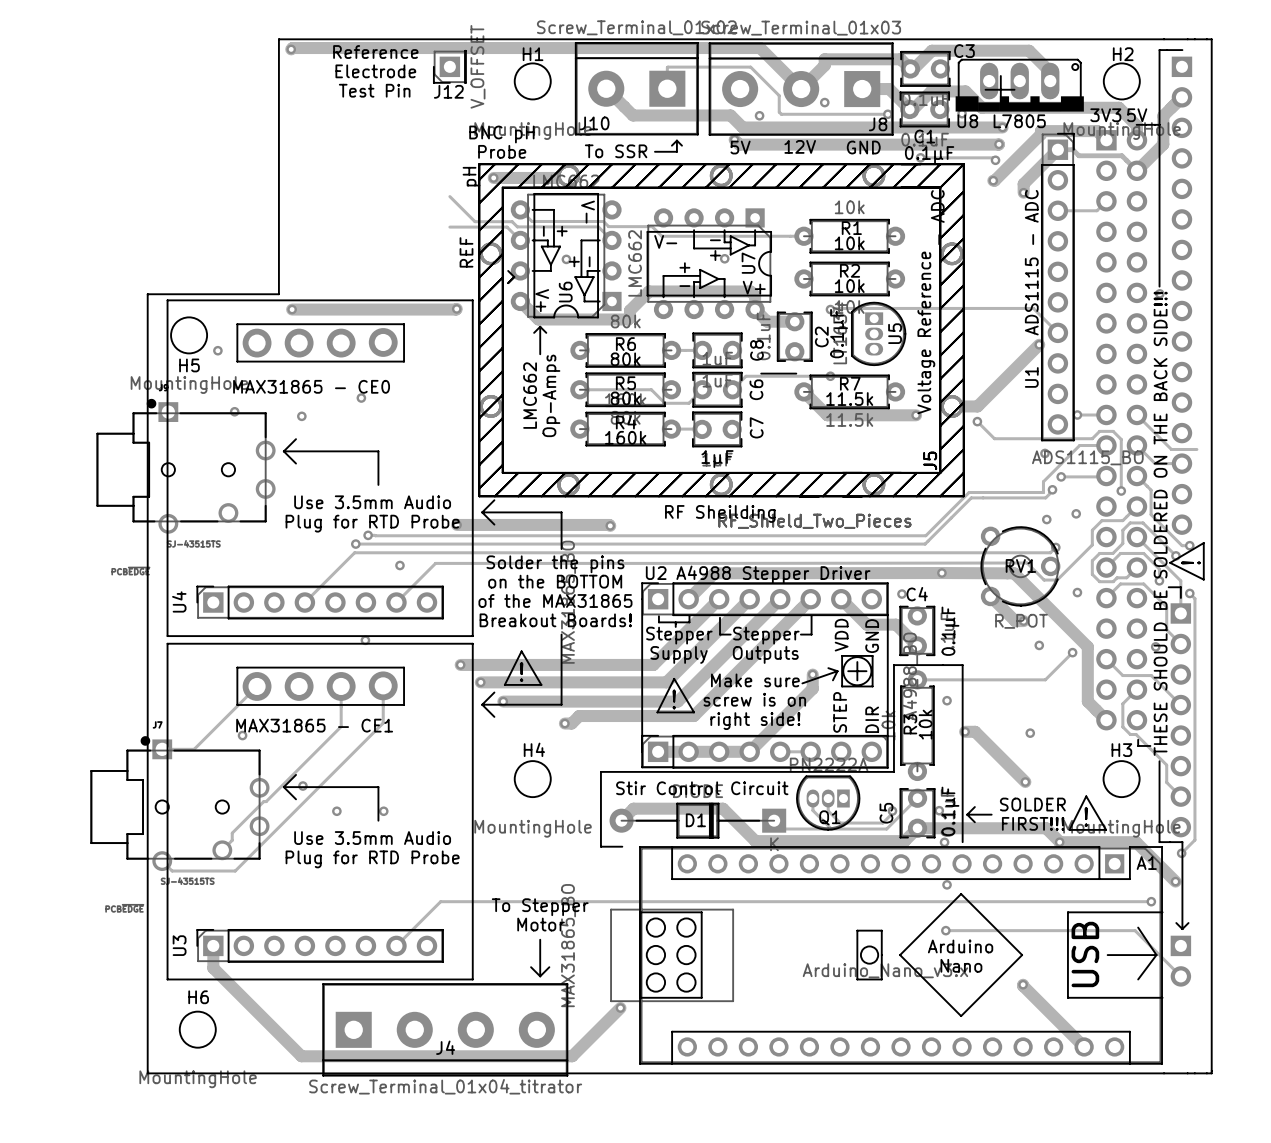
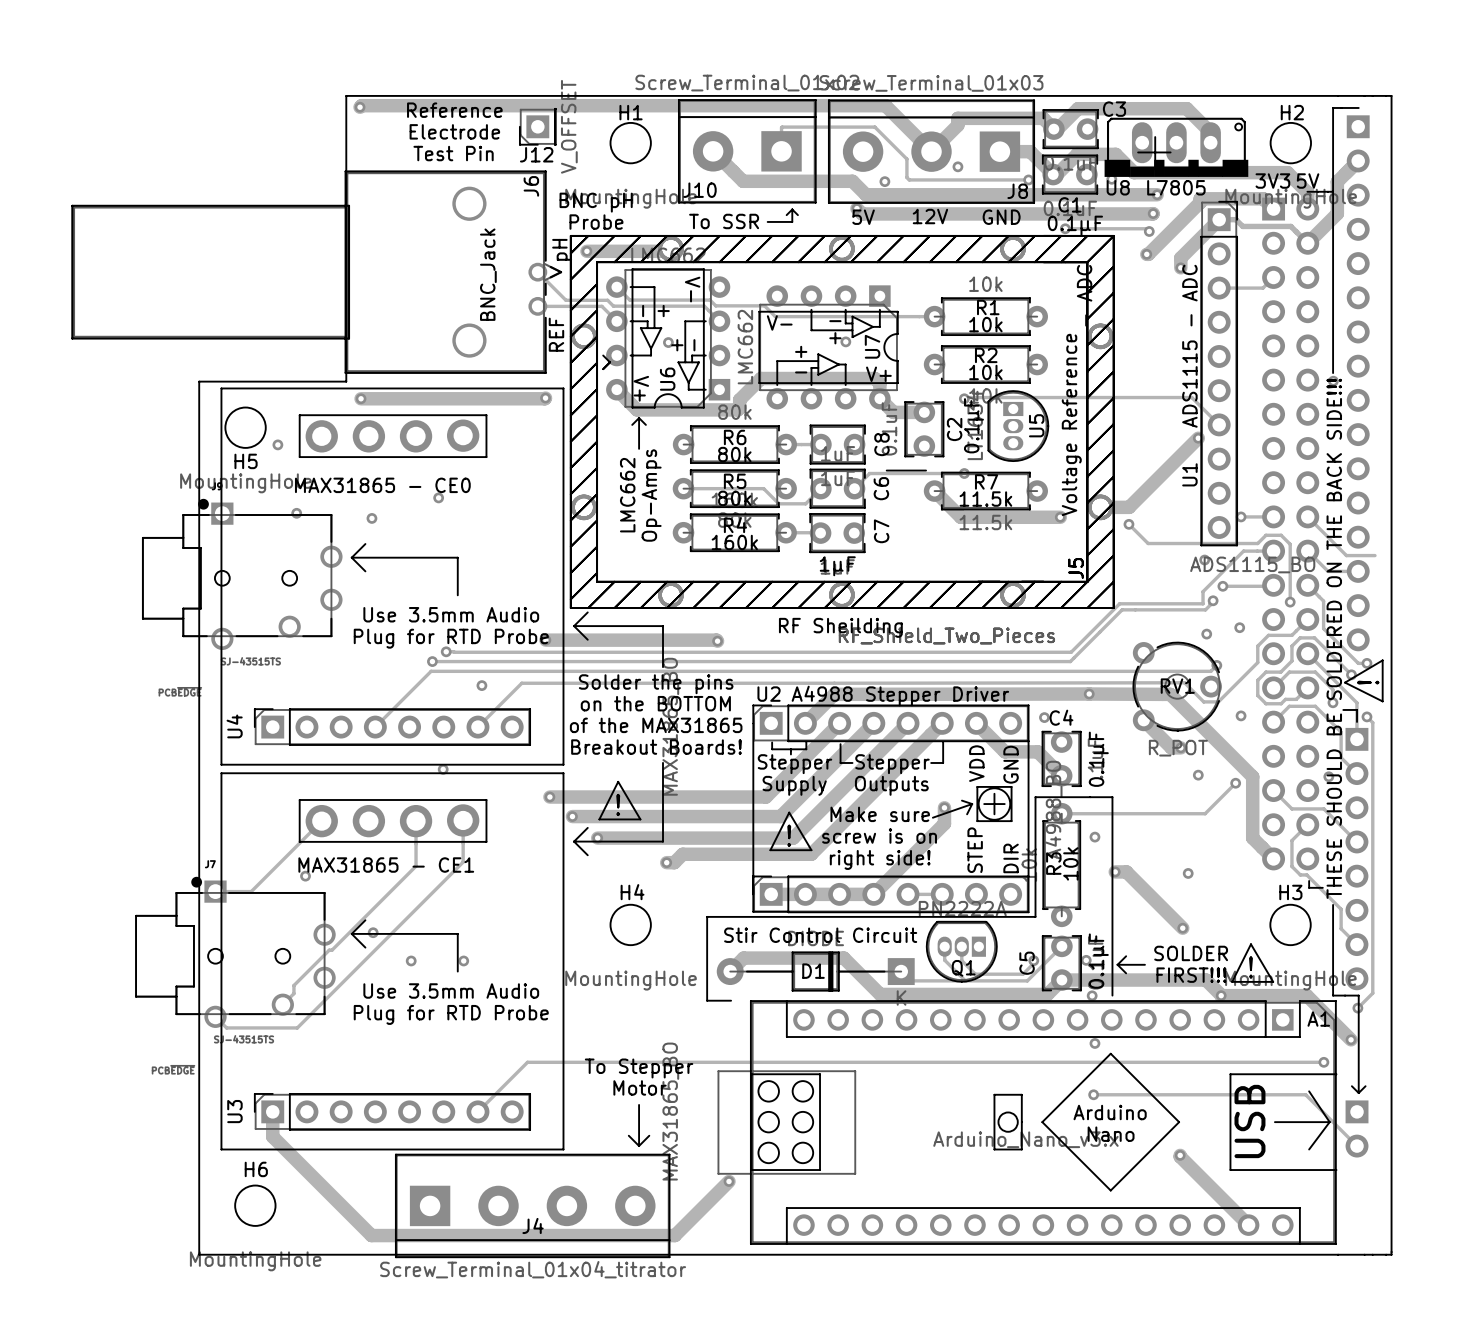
J6: none -> BNC_Jack (316, 272)

